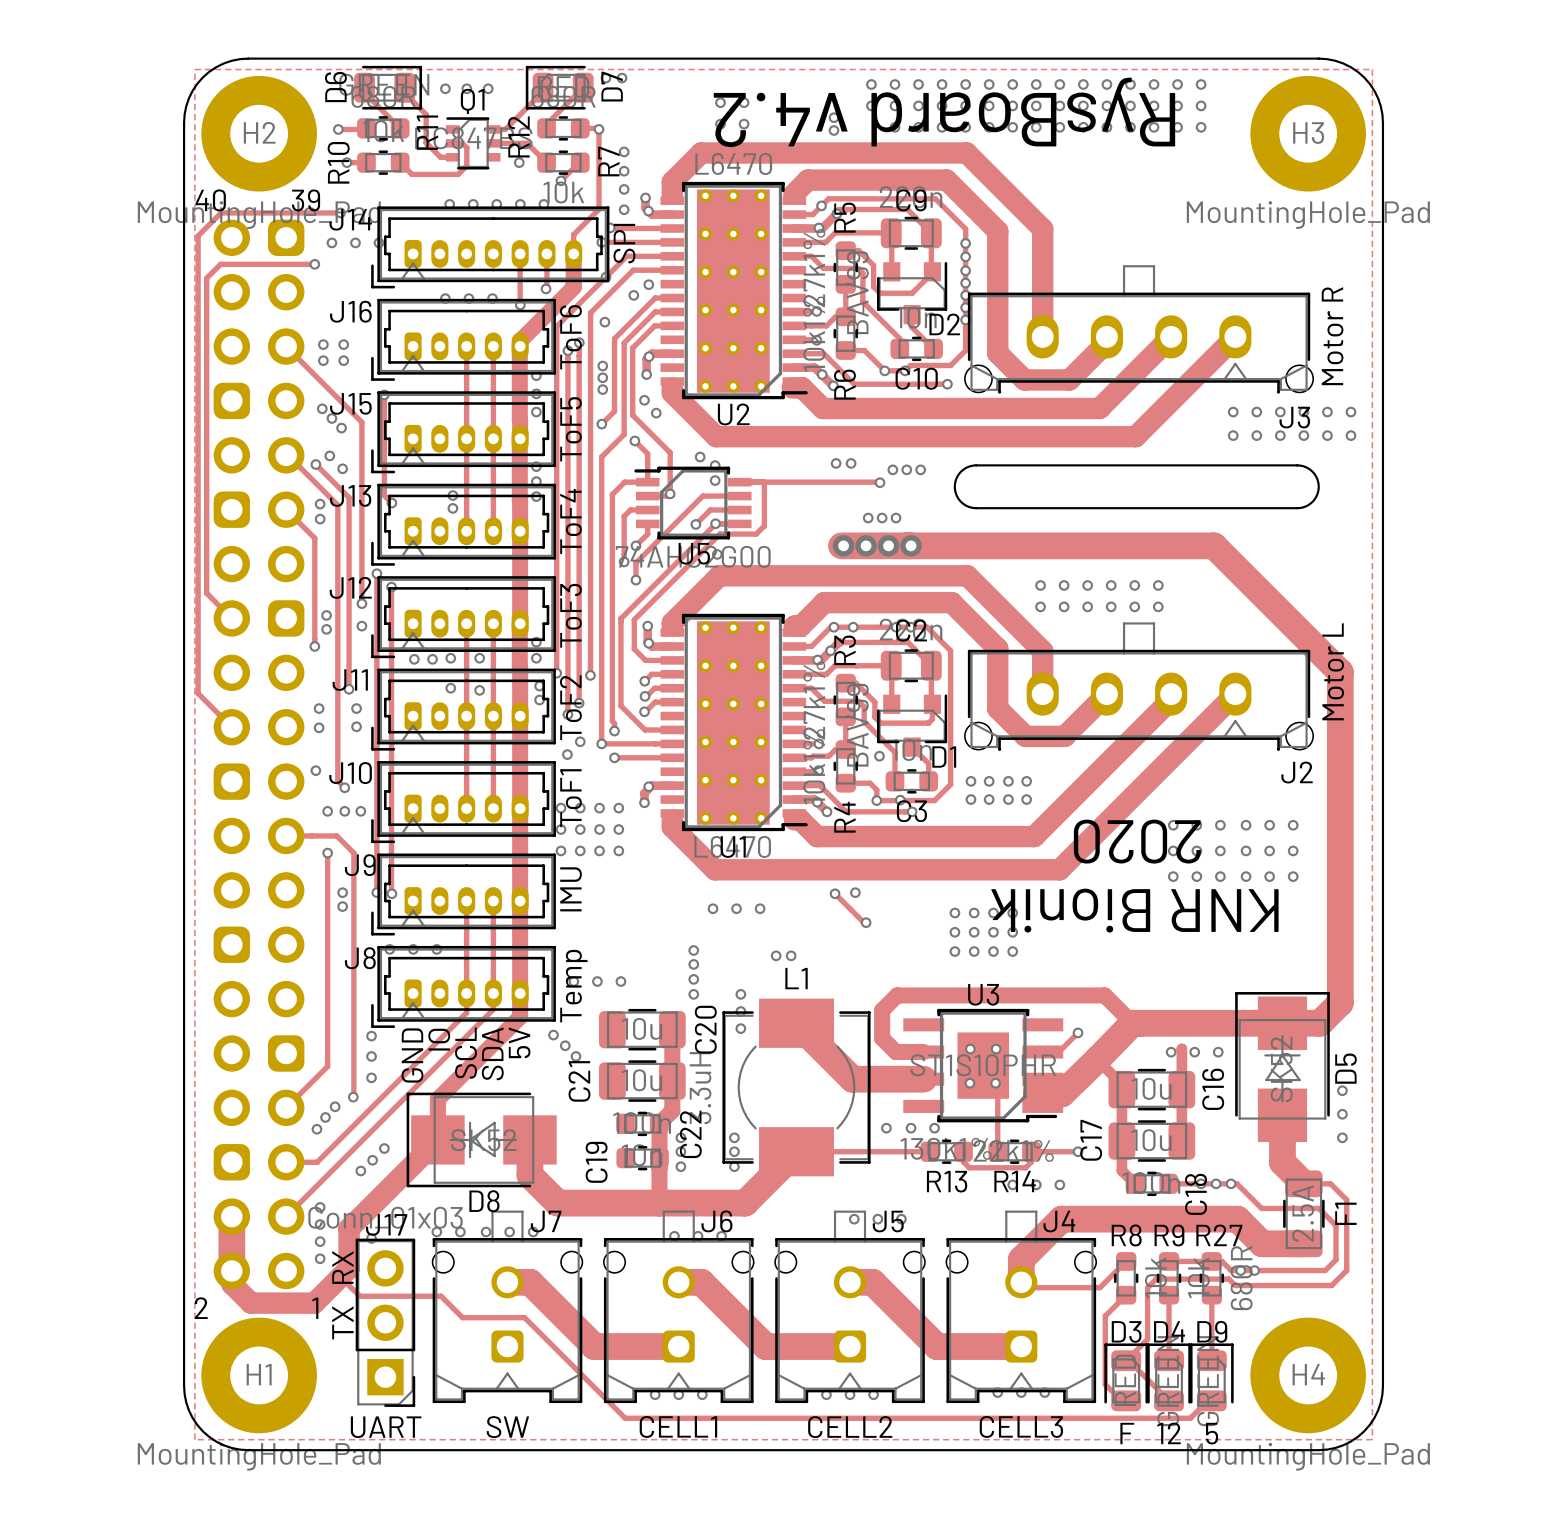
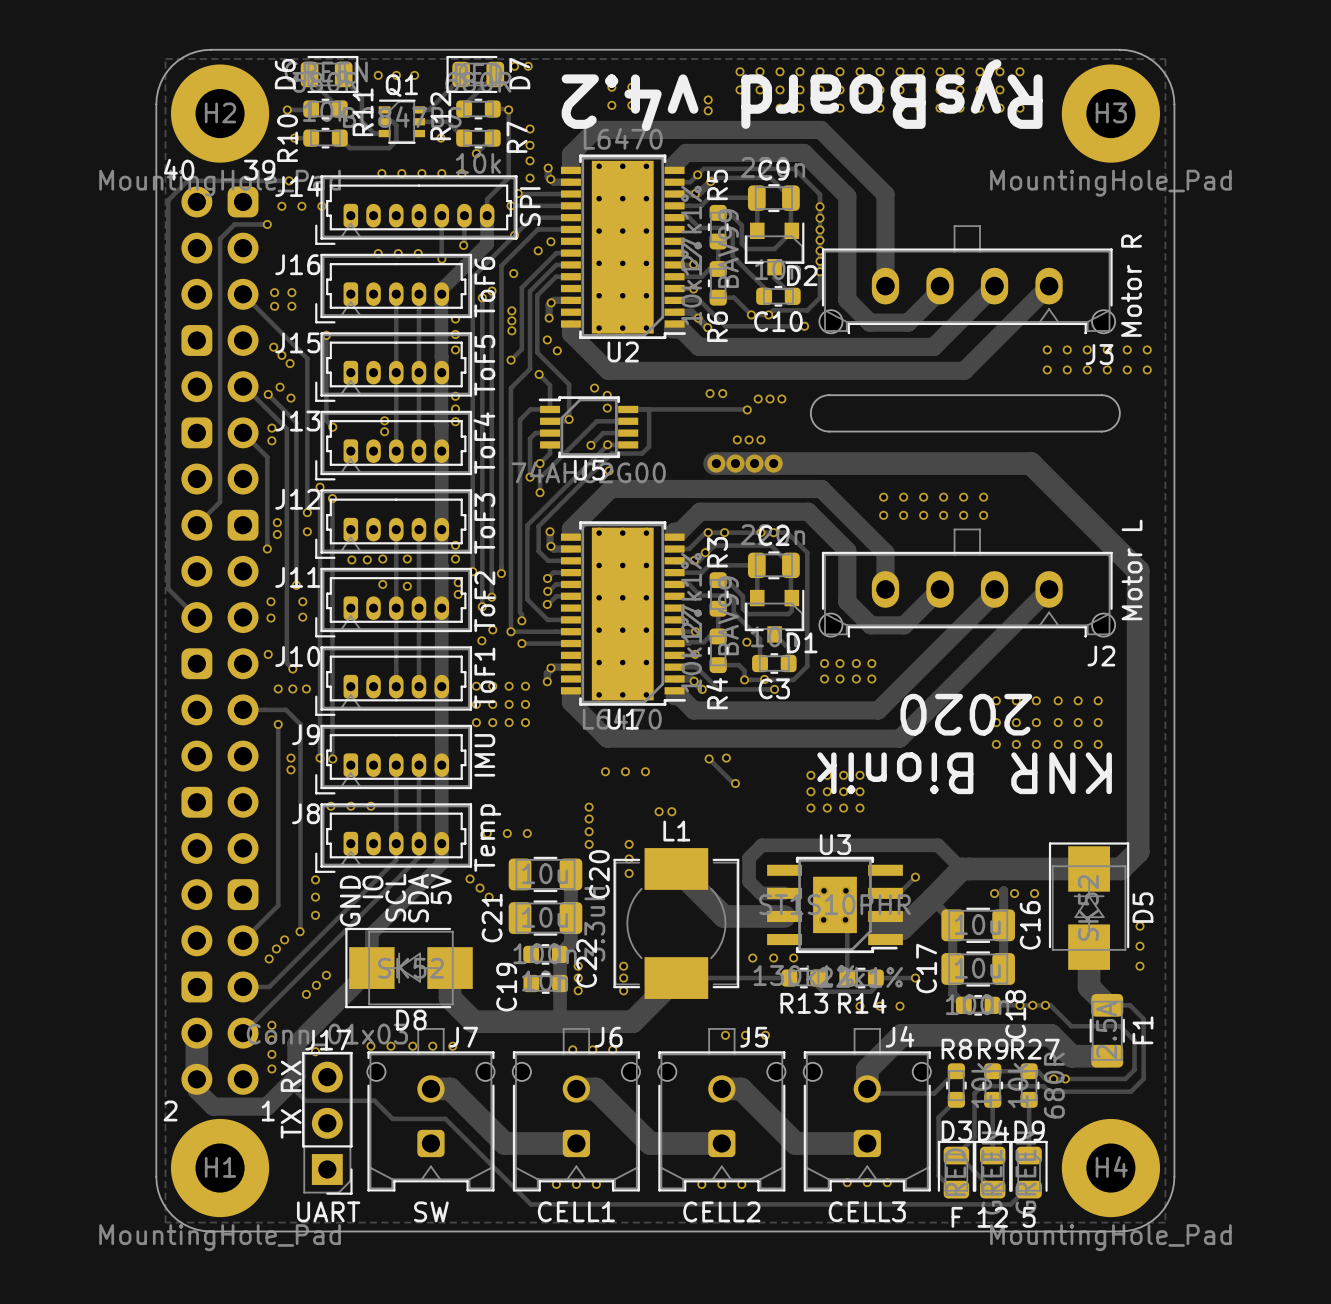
track: (276, 264) (220, 264) (206, 278) (206, 593) (231, 618) -> (234, 224) (220, 239) (220, 502) (196, 525)

